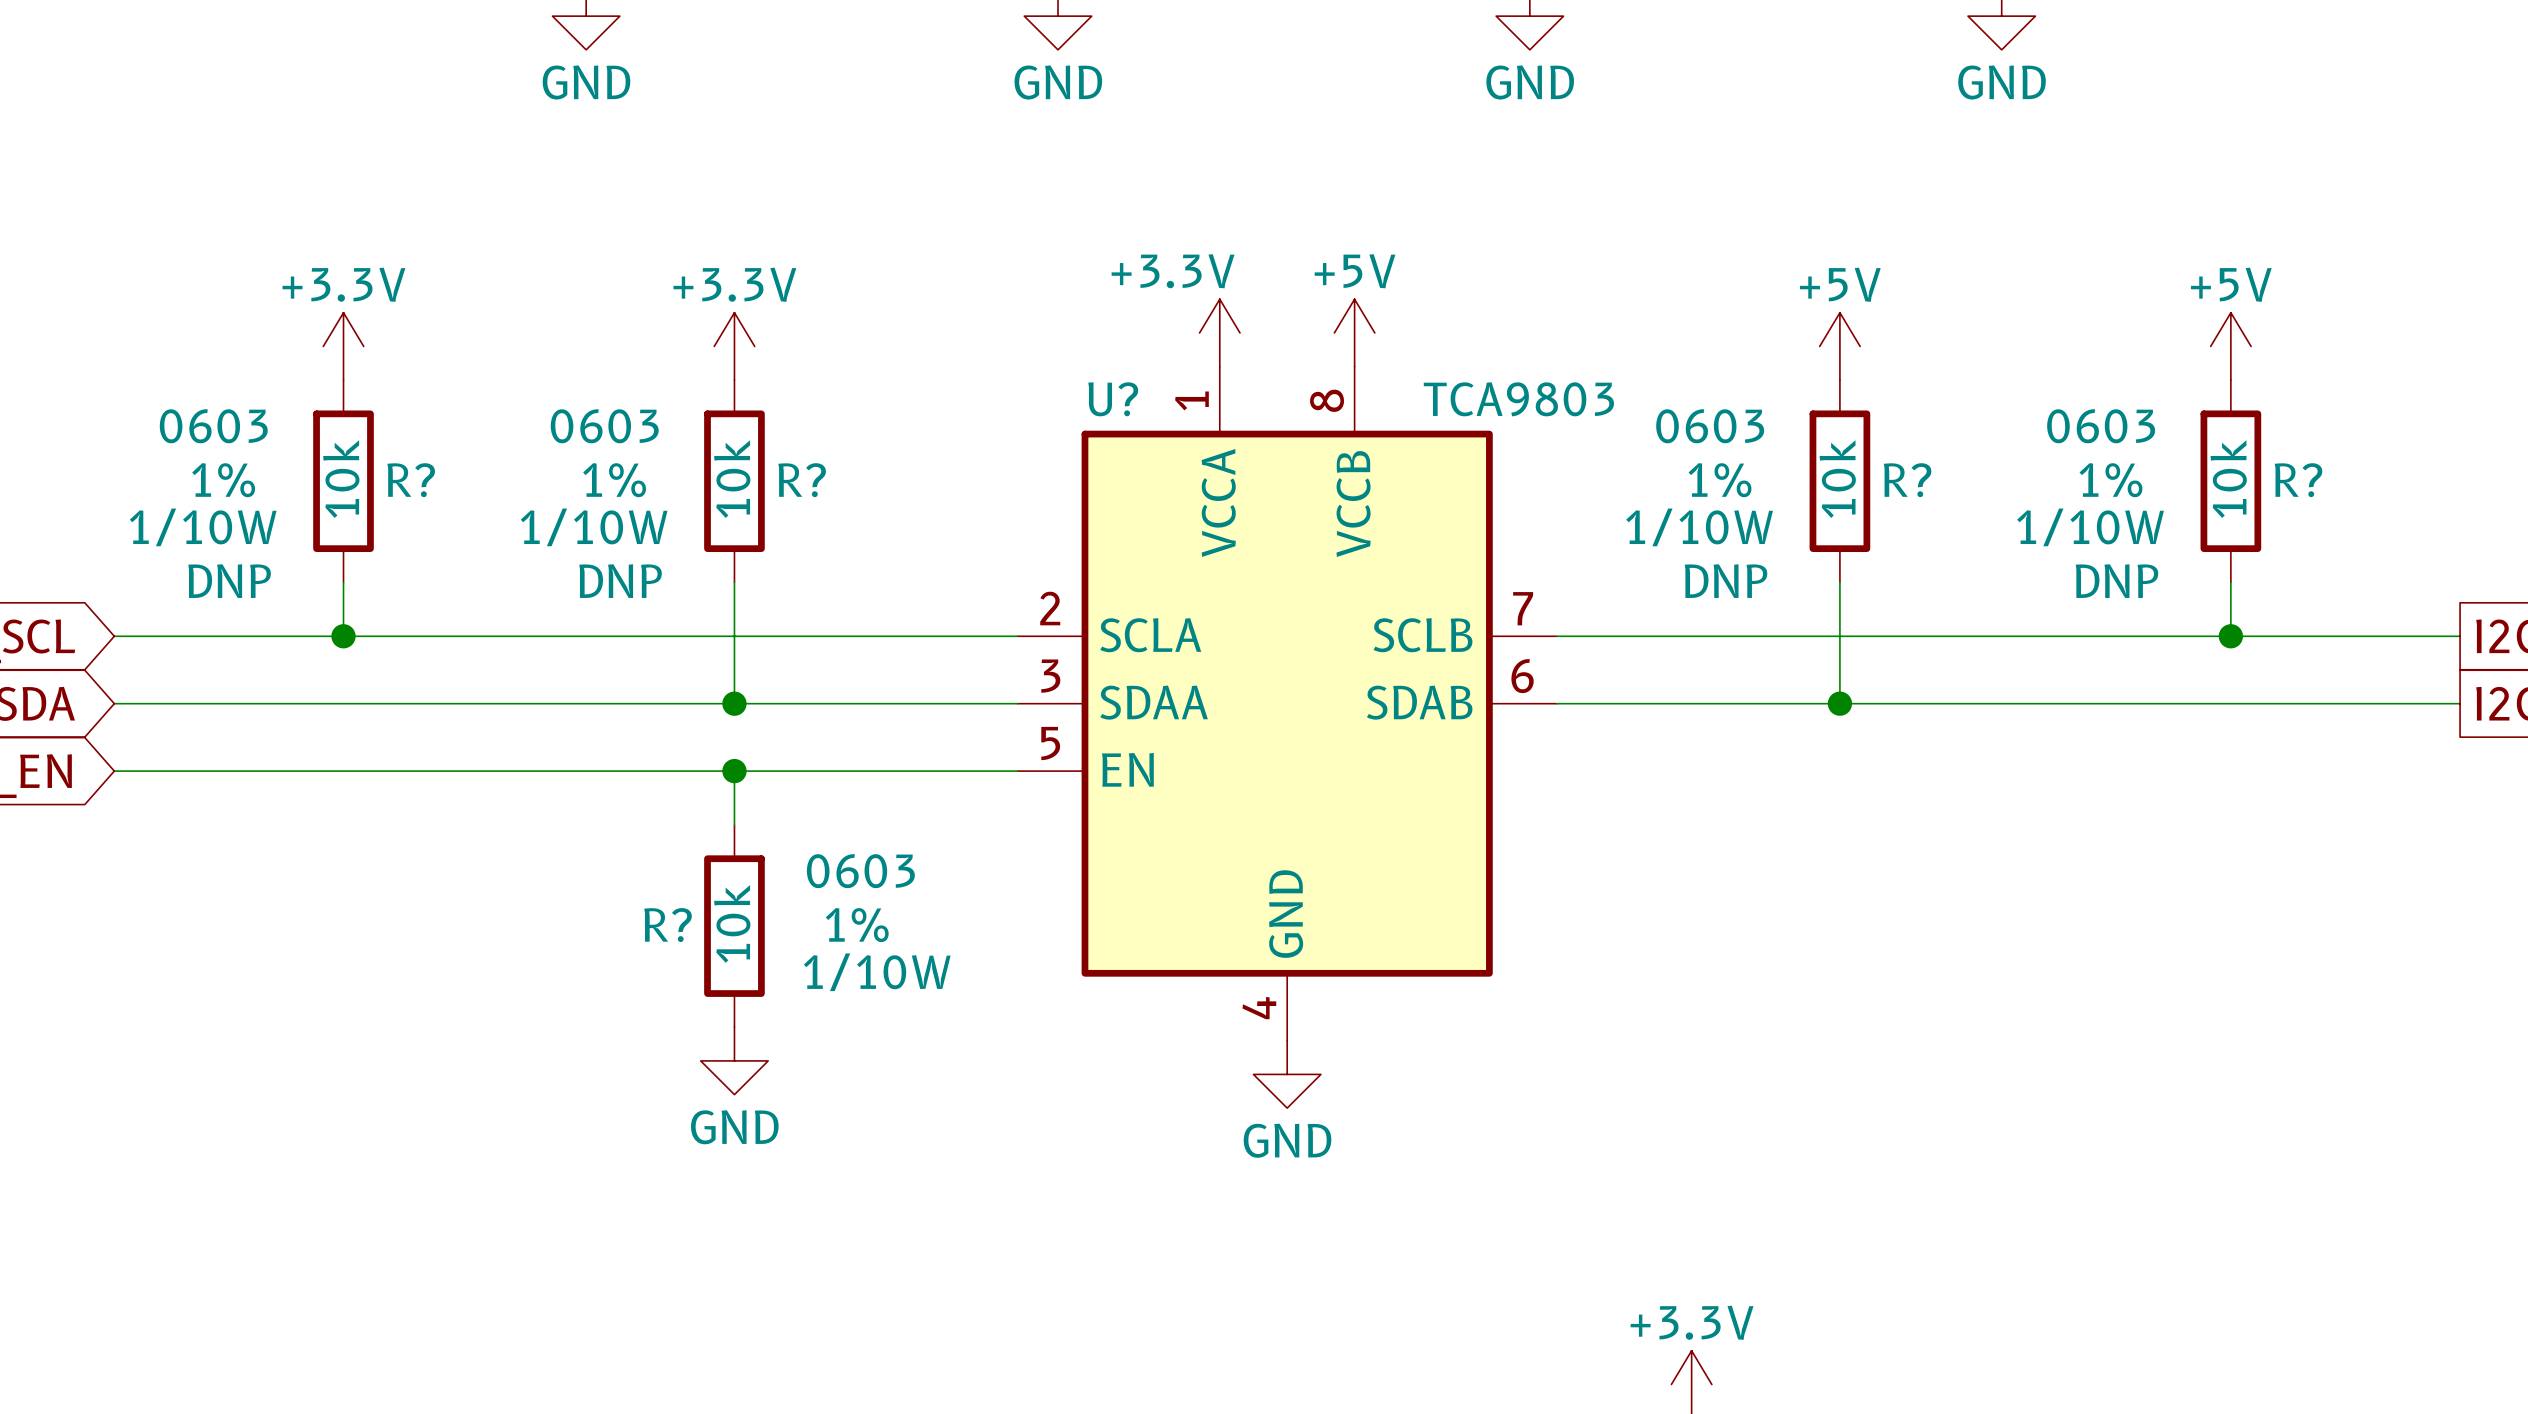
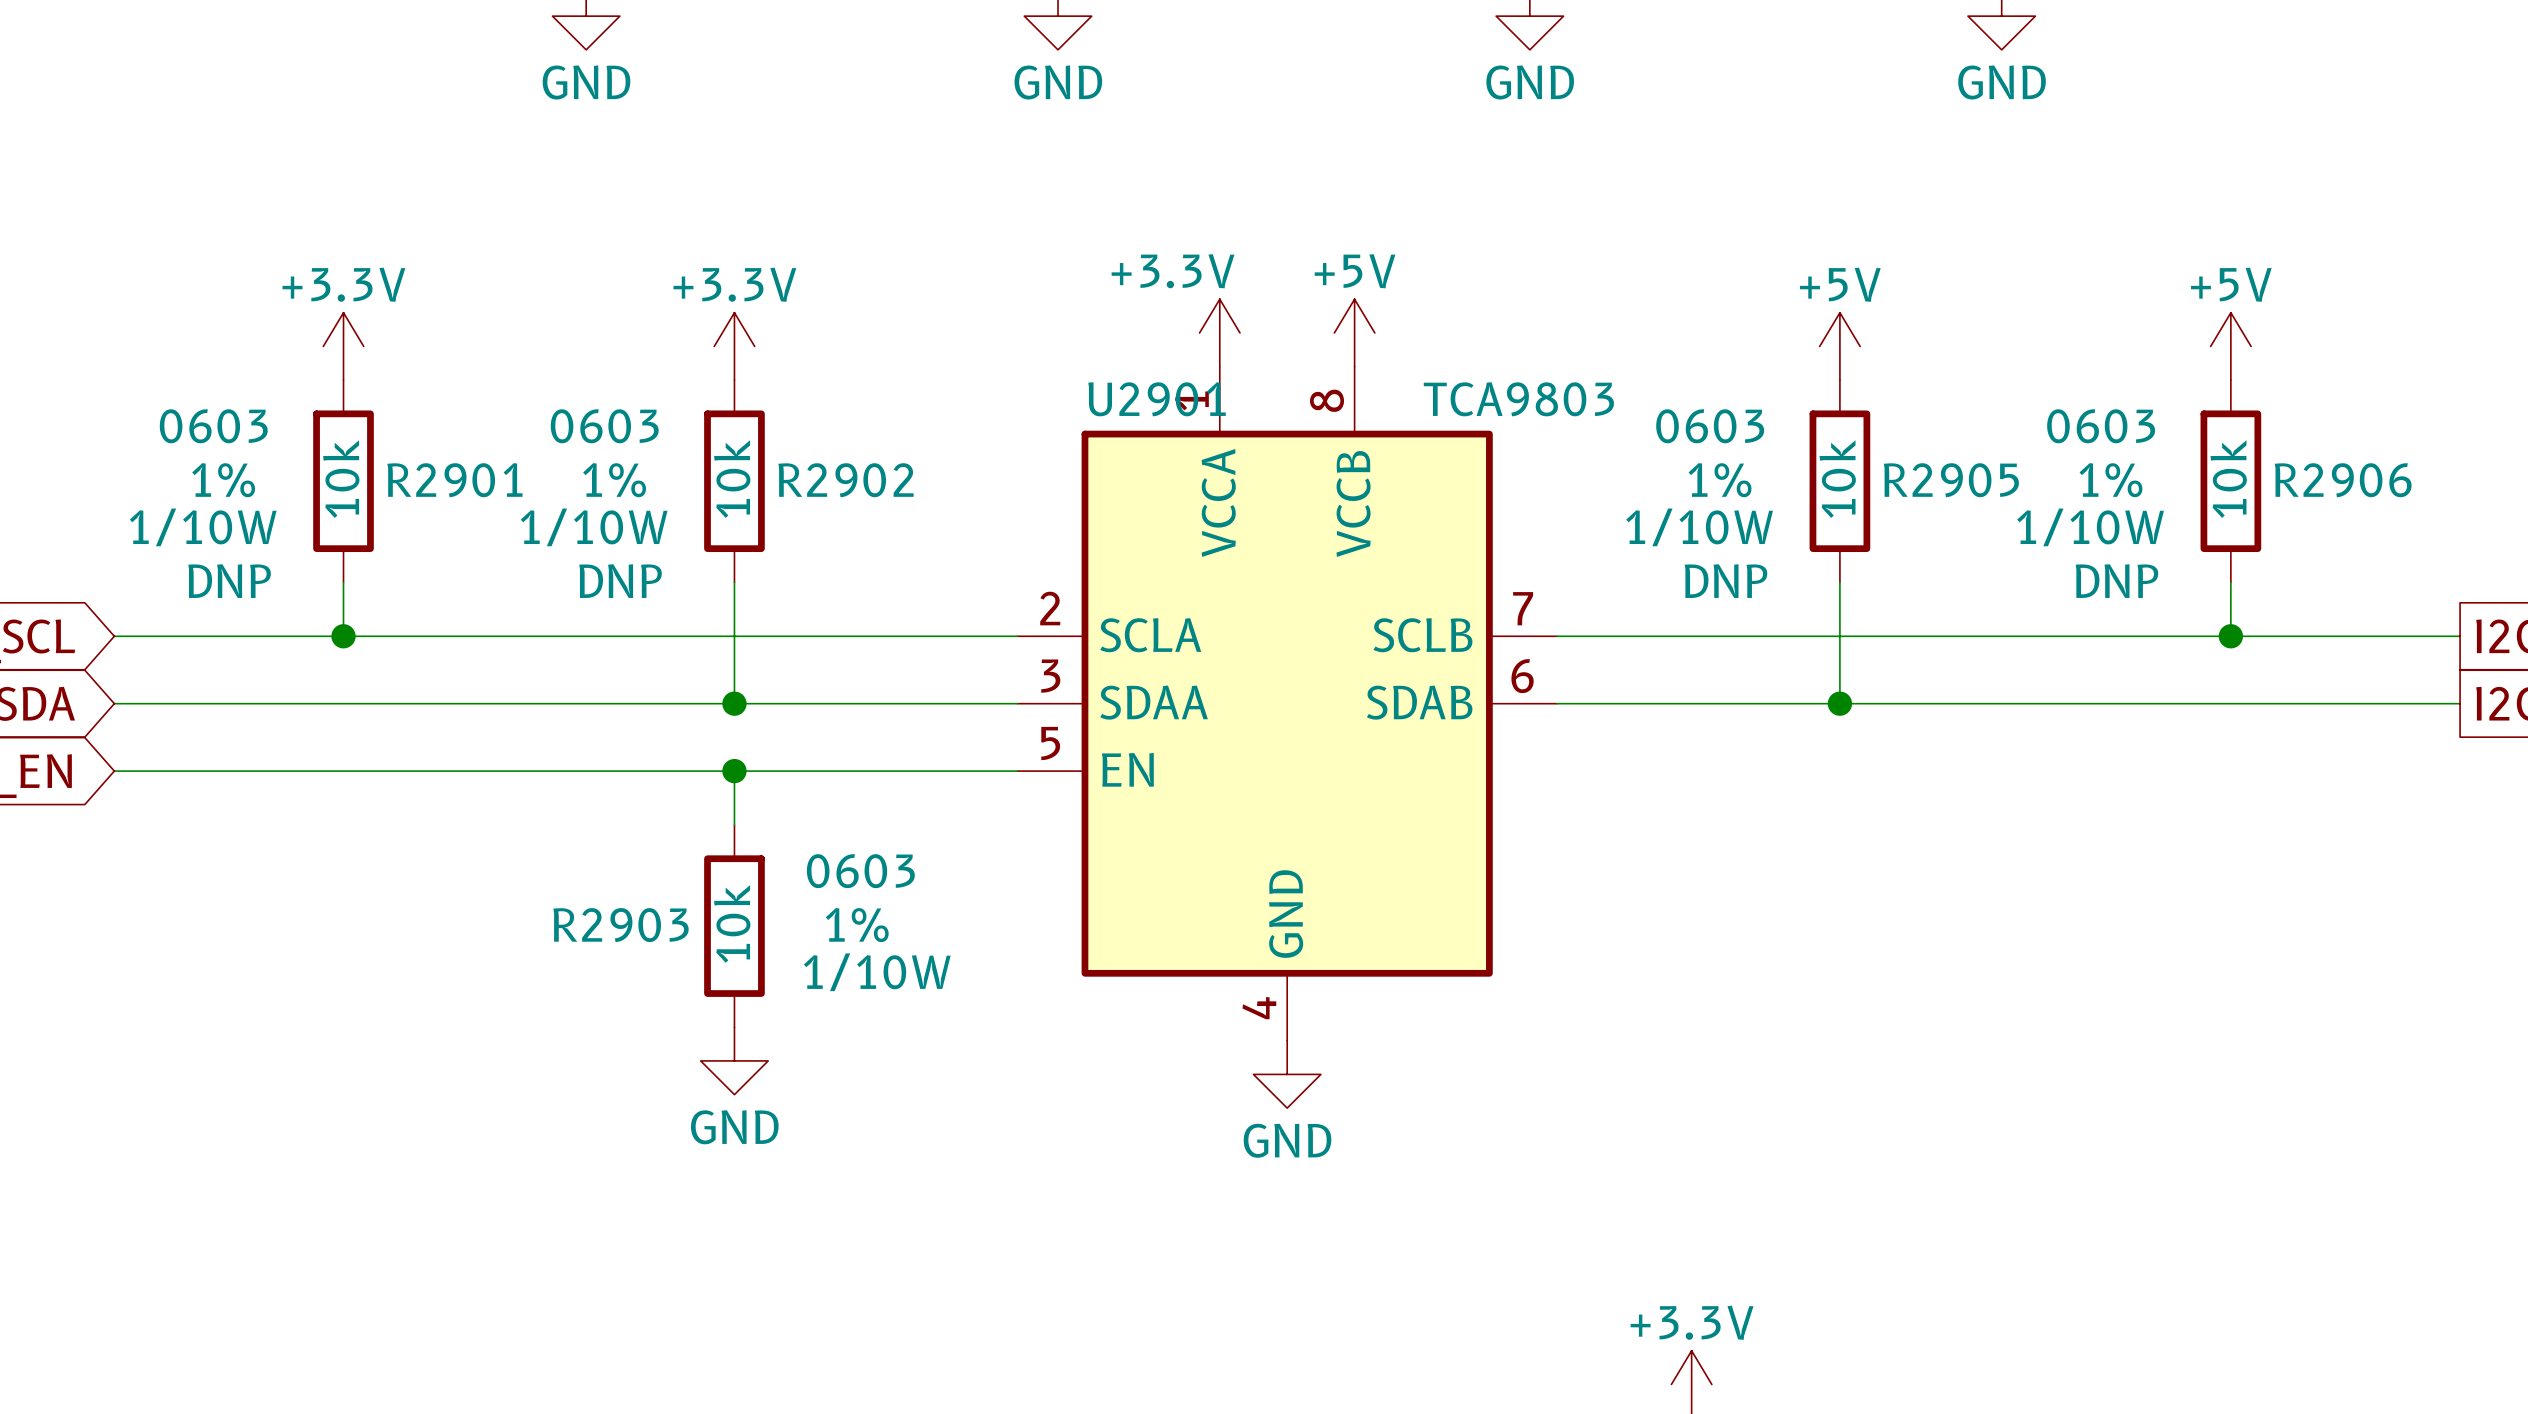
U? name: U? (1113, 399) -> U2901 (1157, 399)
R? name: R? (411, 480) -> R2901 (454, 480)
R? name: R? (802, 480) -> R2902 (845, 480)
R? name: R? (1907, 480) -> R2905 (1951, 480)
R? name: R? (2298, 480) -> R2906 (2343, 480)
R? name: R? (668, 925) -> R2903 (620, 925)

